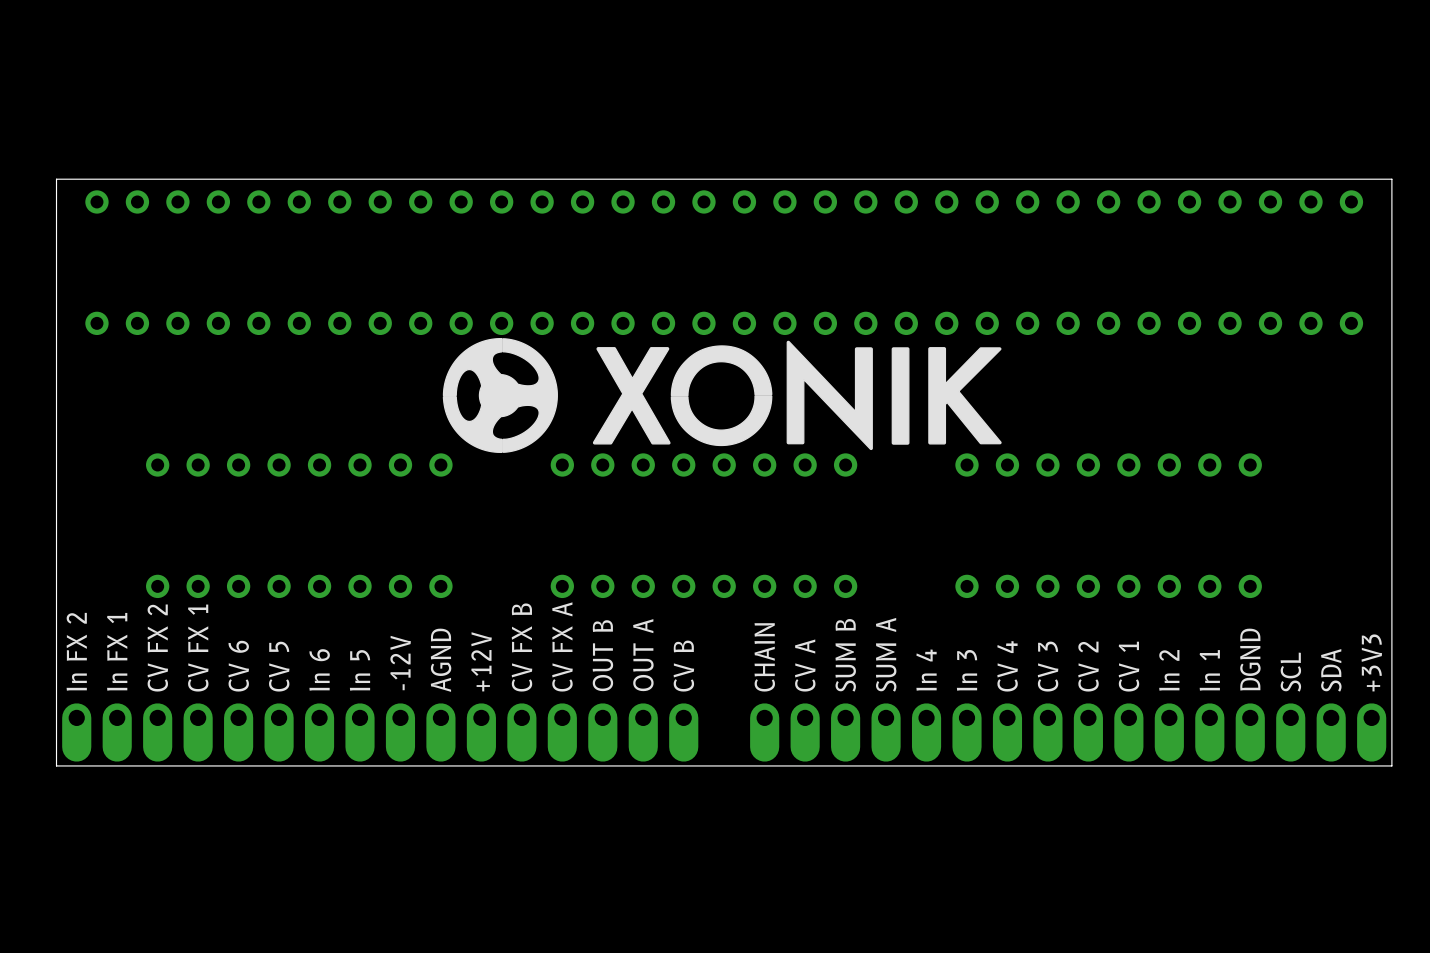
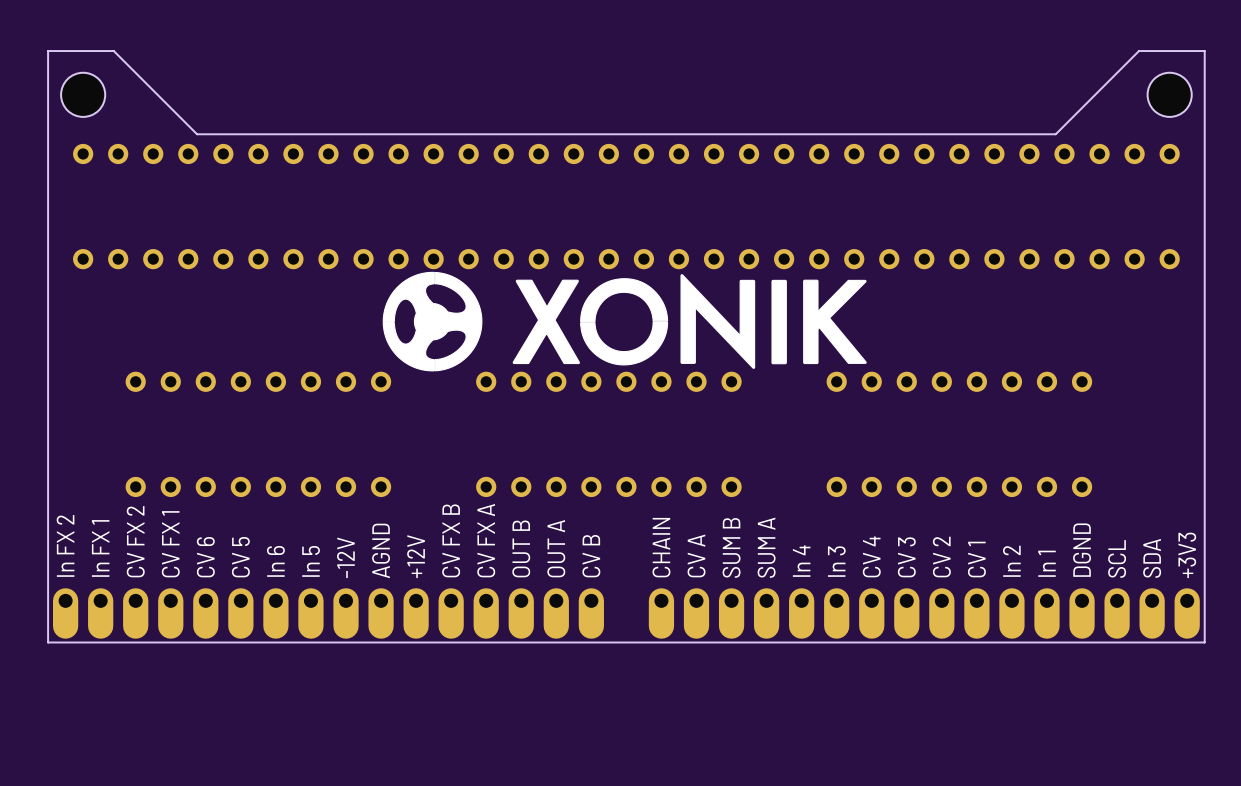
hole: none -> (83, 94)
hole: none -> (1169, 94)
board edge: (228, 179) (56, 179) -> (197, 134) (113, 51) (48, 51) (48, 134)
board edge: (1391, 179) (1219, 179) -> (1204, 134) (1204, 51) (1139, 51) (1055, 134)

